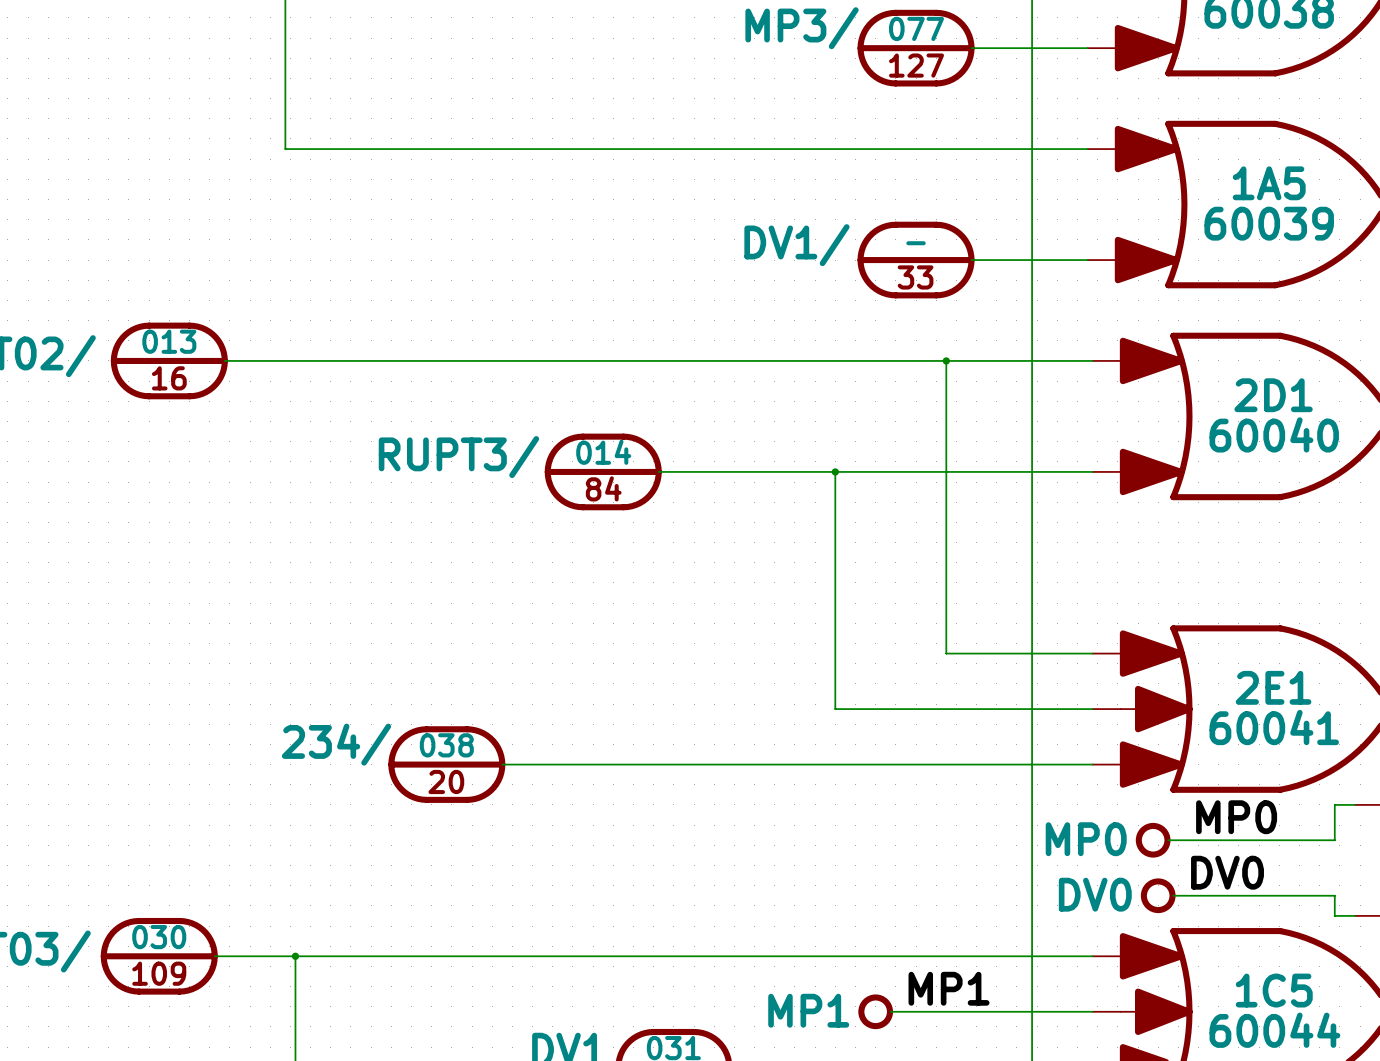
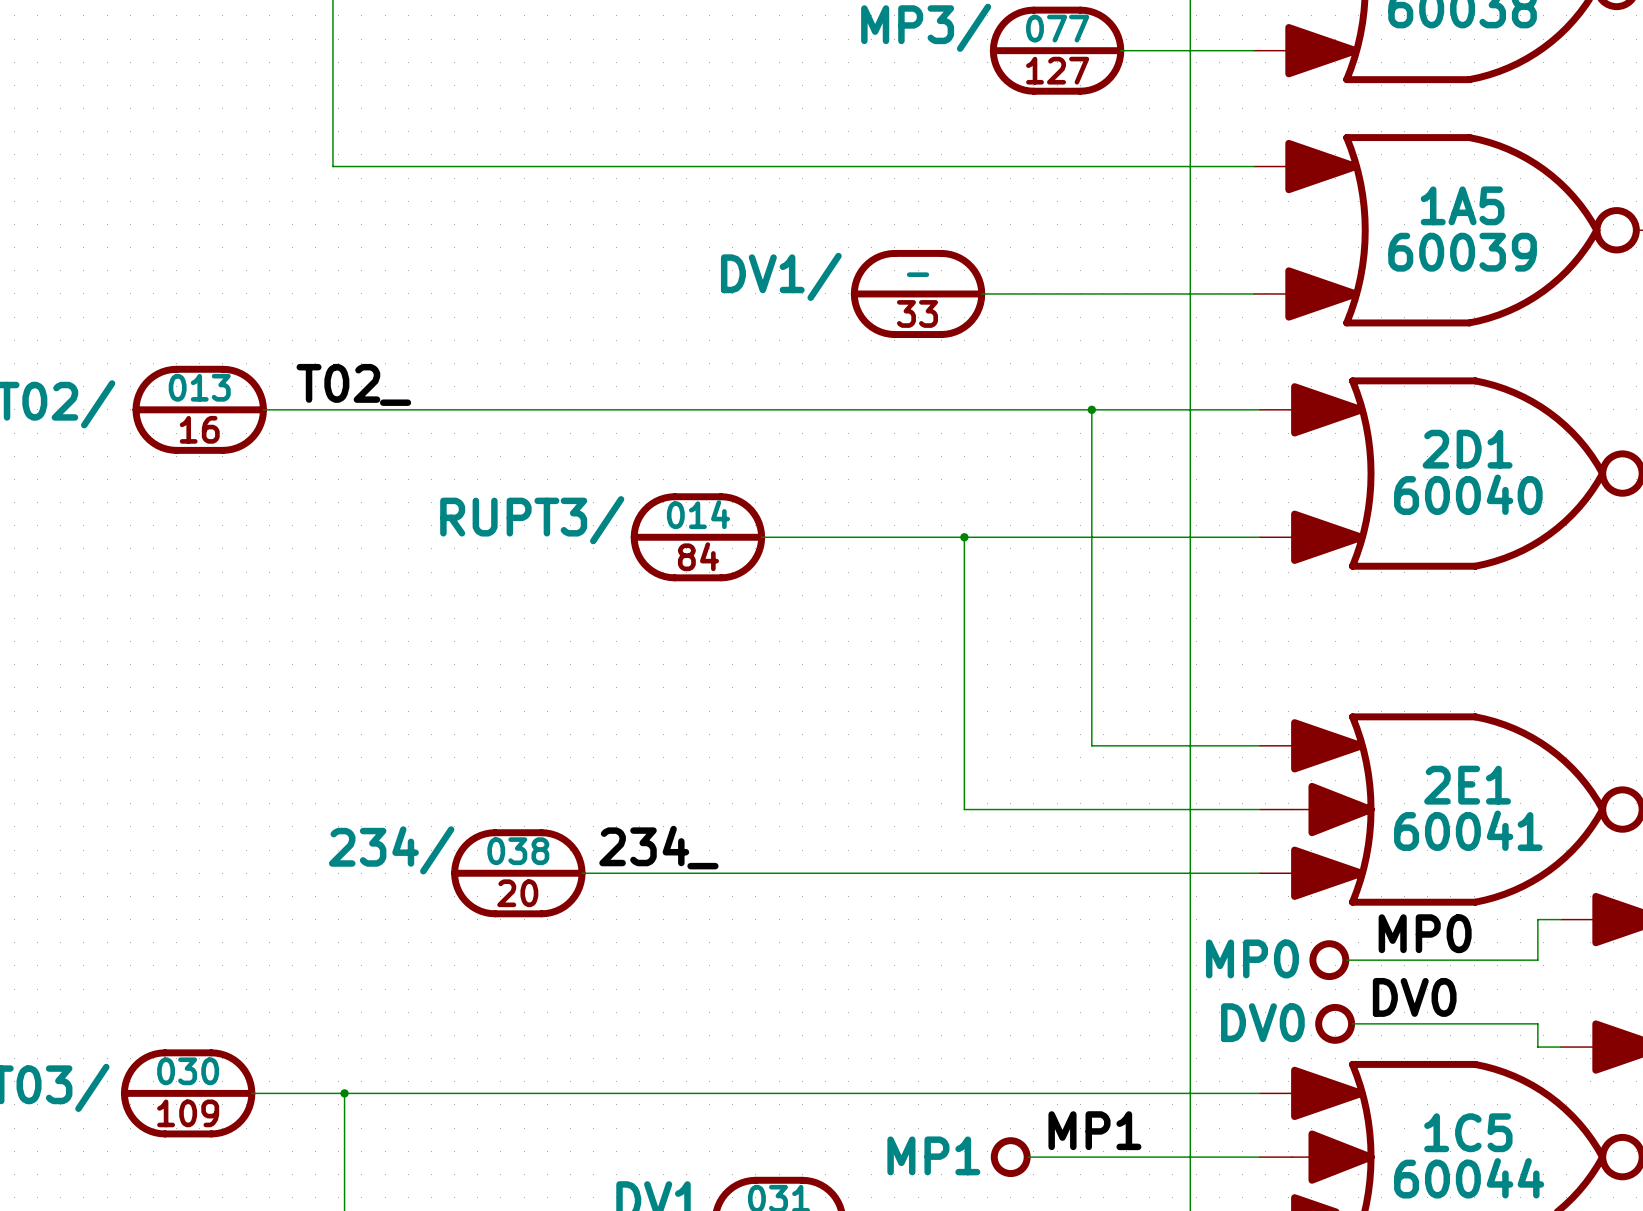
part position: (916, 260) -> (918, 293)
label: none -> T02_ (353, 384)
label: none -> 234_ (658, 847)

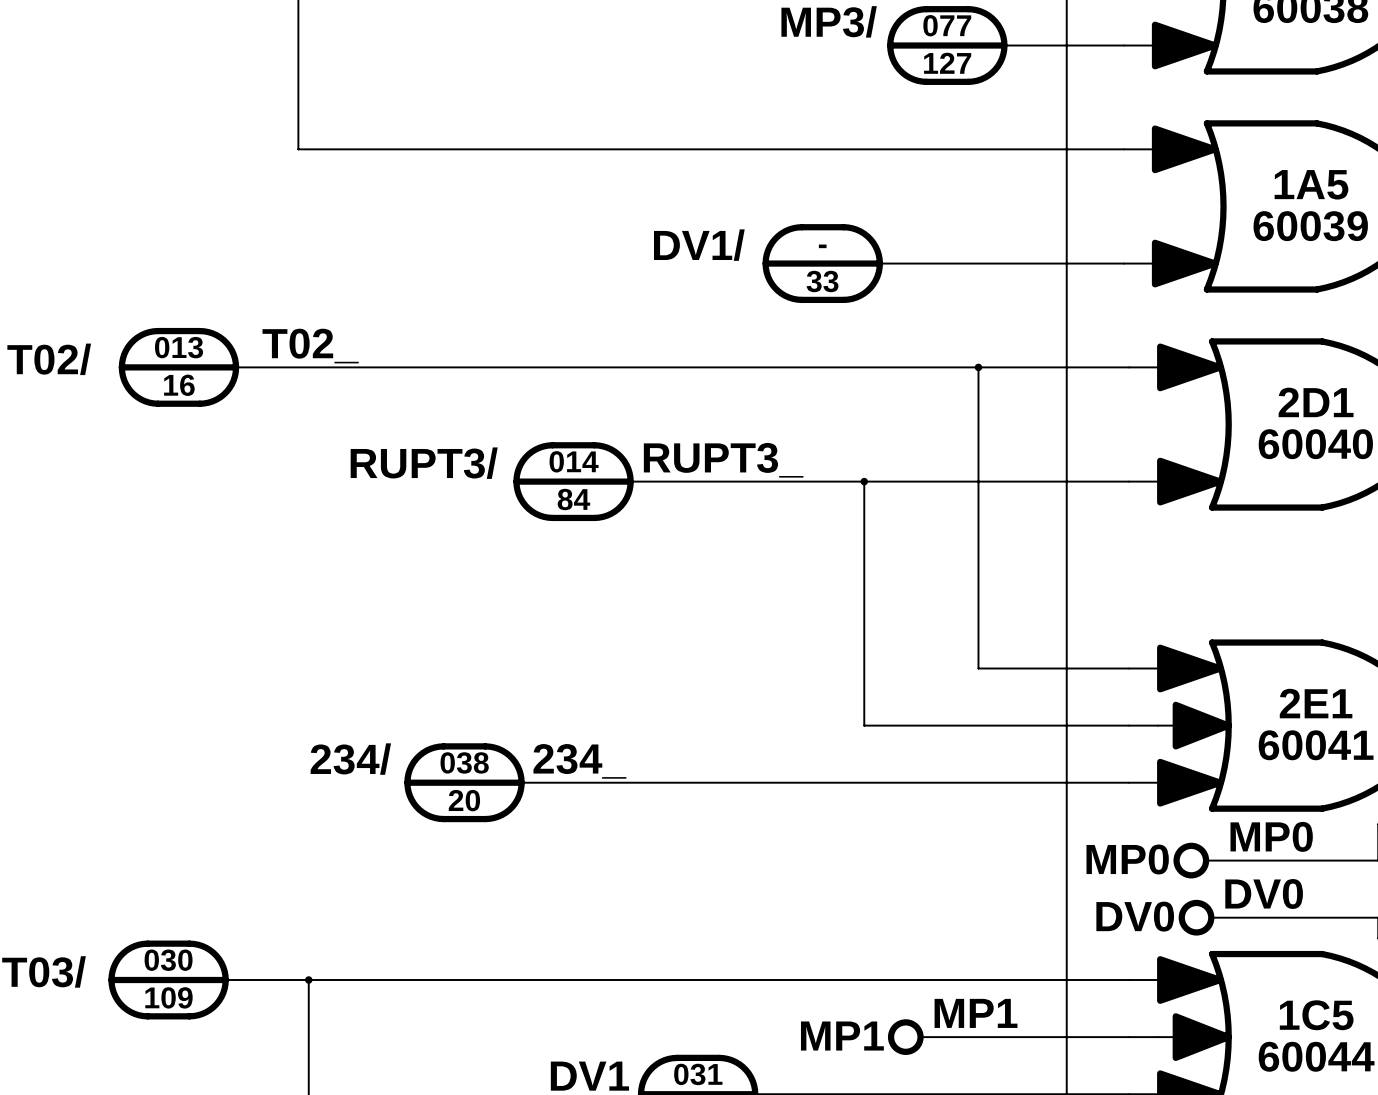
label: none -> RUPT3_ (723, 460)
part position: (697, 537) -> (573, 481)

